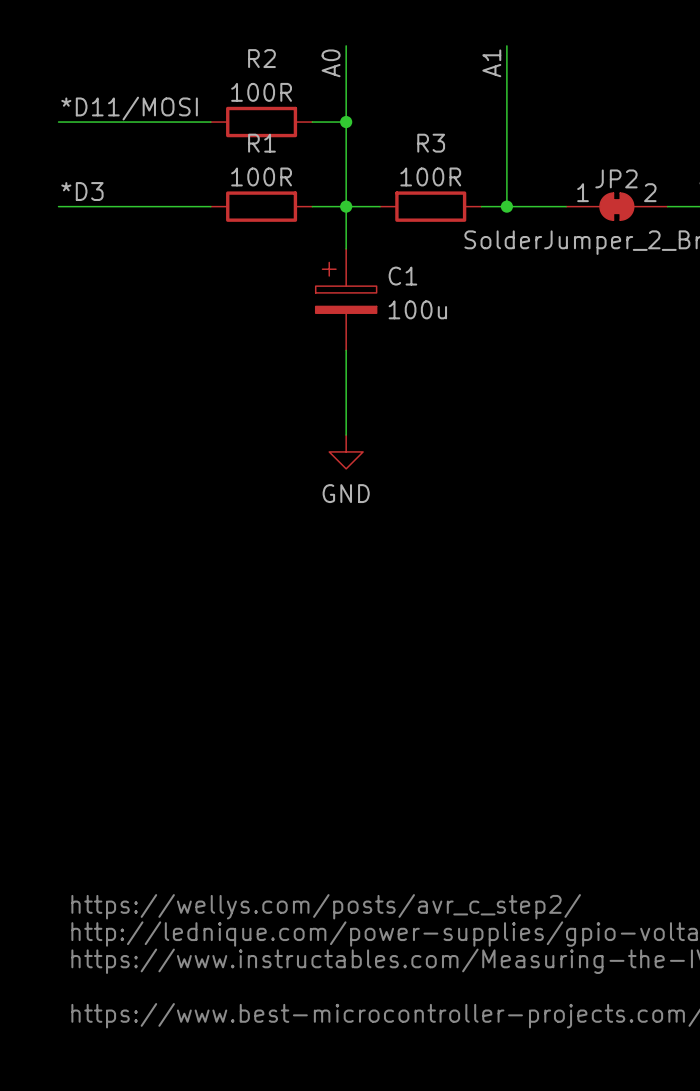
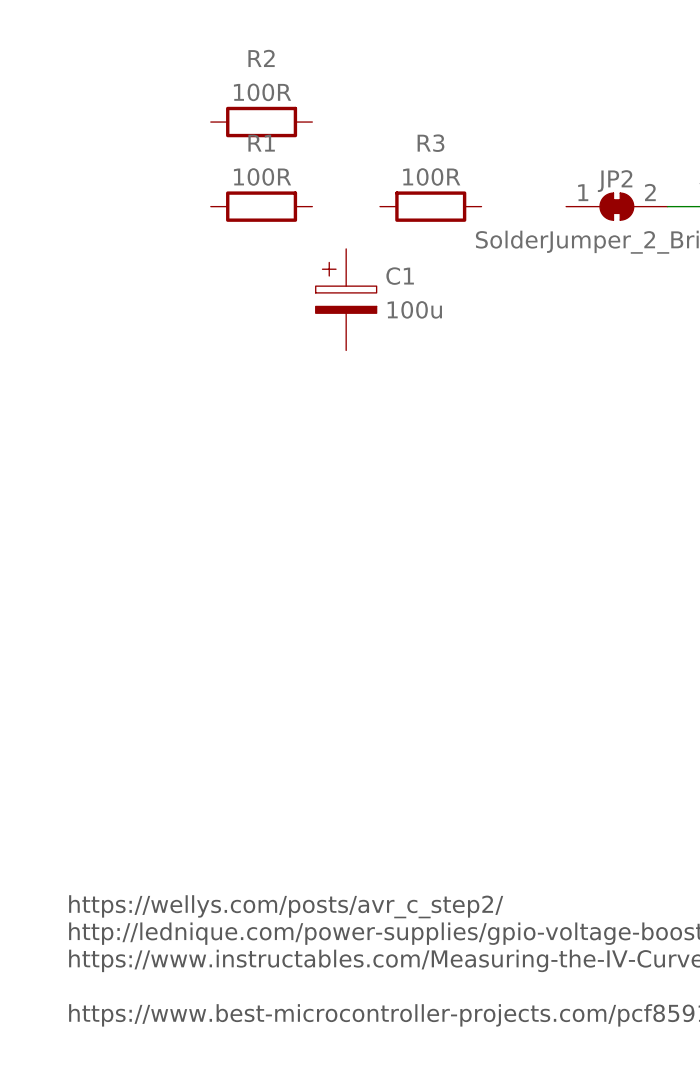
wire: (346, 45) (346, 248) -> none
wire: (506, 45) (506, 206) -> none
label: A0 (331, 63) -> none
label: A1 (491, 63) -> none
label: *D11/MOSI (129, 108) -> none
wire: (58, 122) (210, 122) -> none
wire: (312, 122) (346, 122) -> none
junction: (346, 122) -> none
label: *D3 (82, 191) -> none
wire: (58, 206) (210, 206) -> none
wire: (312, 206) (380, 206) -> none
junction: (346, 206) -> none
wire: (481, 206) (566, 206) -> none
junction: (506, 206) -> none
wire: (346, 350) (346, 435) -> none
power symbol: GND (346, 451) -> none

